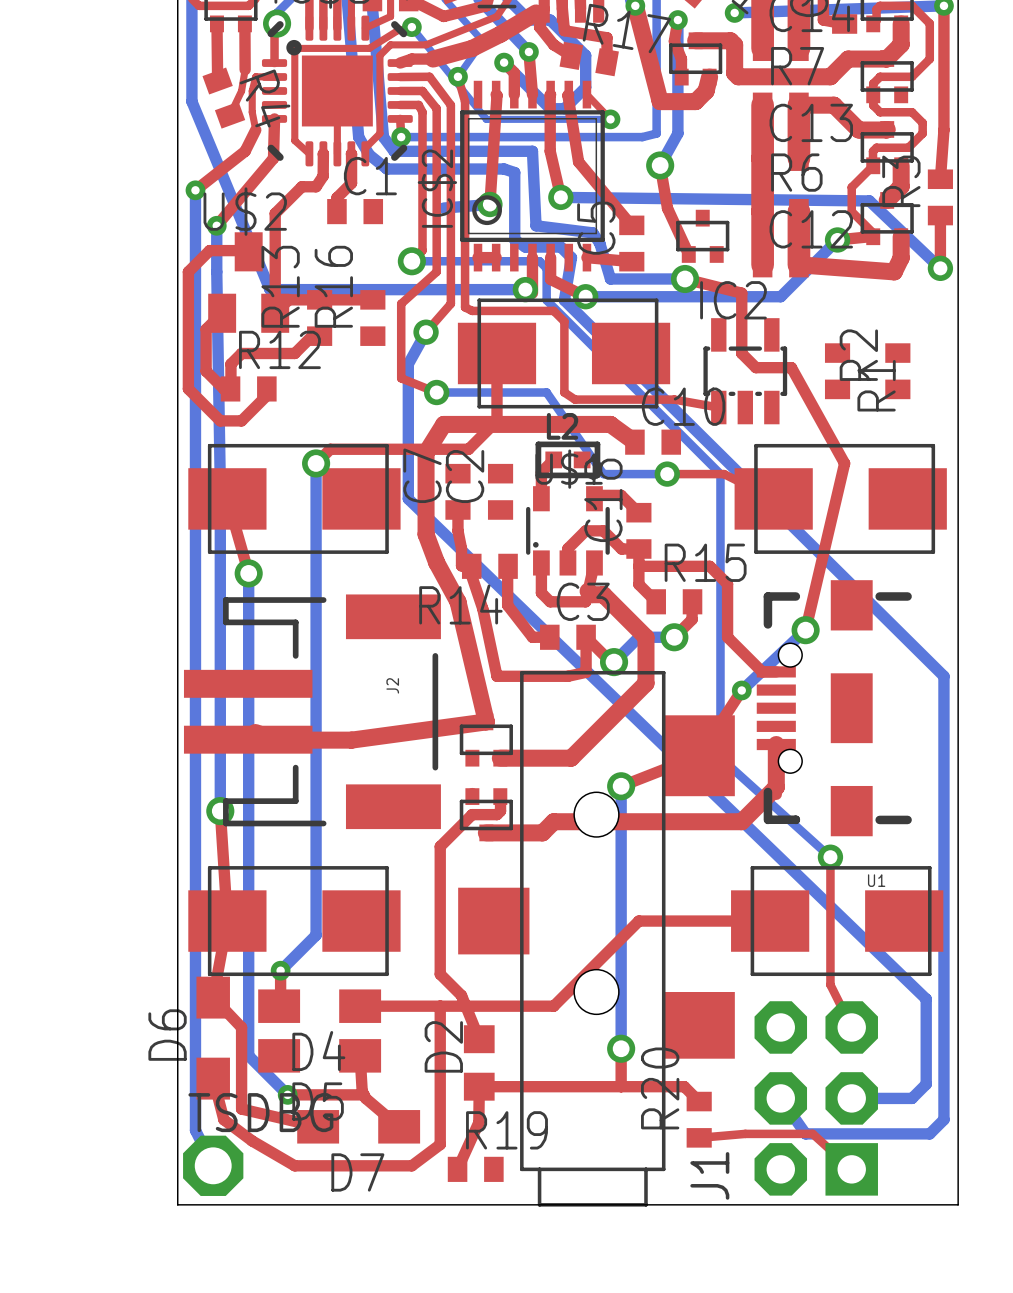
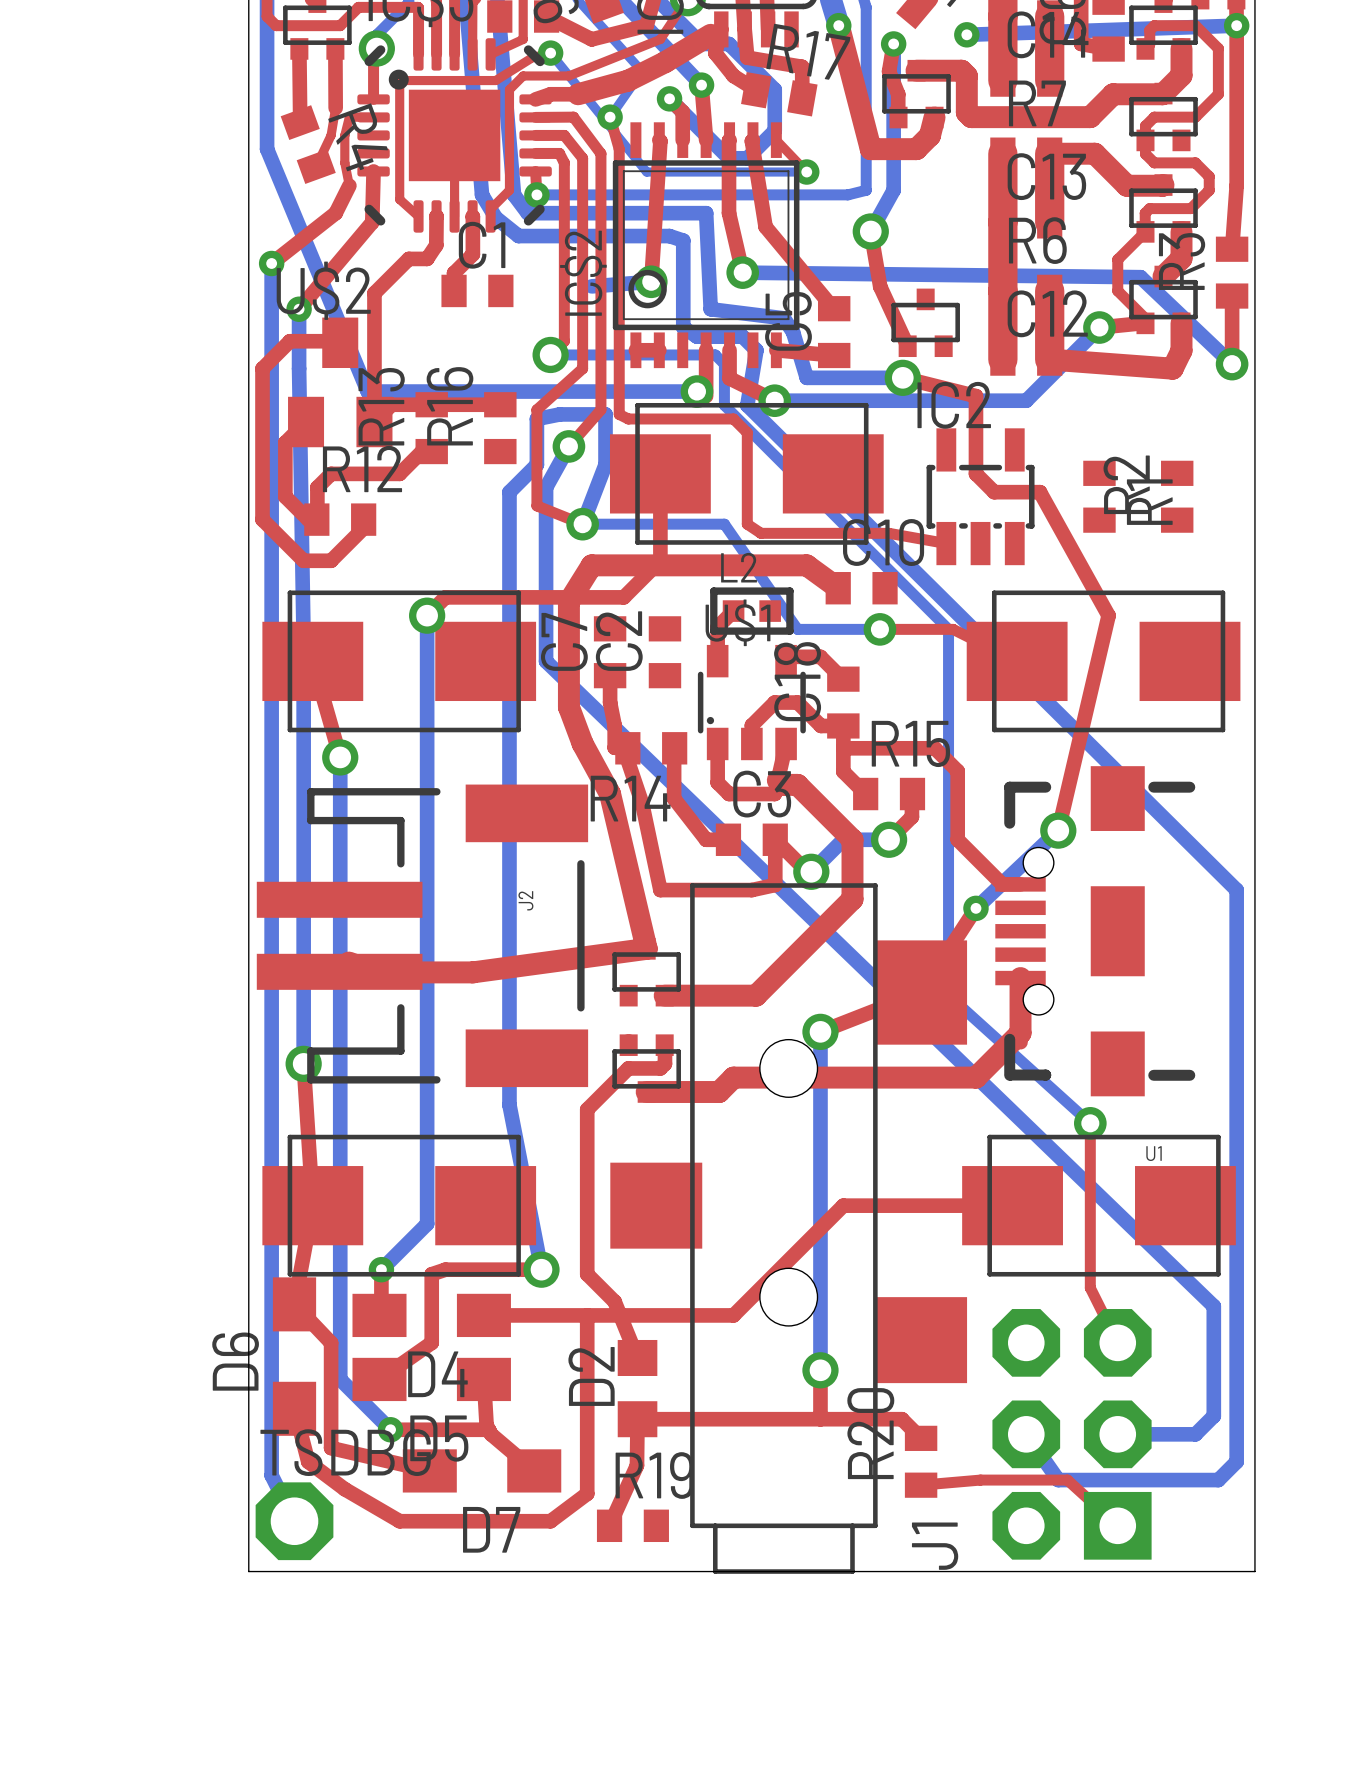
bottom track: none -> (582, 524) (605, 464) (605, 414) (559, 414) (536, 418) (536, 464) (509, 492) (509, 1105) (541, 1269)
top track: none -> (541, 1269) (445, 1269) (431, 1274) (431, 1342) (379, 1379)
via: none -> (541, 1269)

